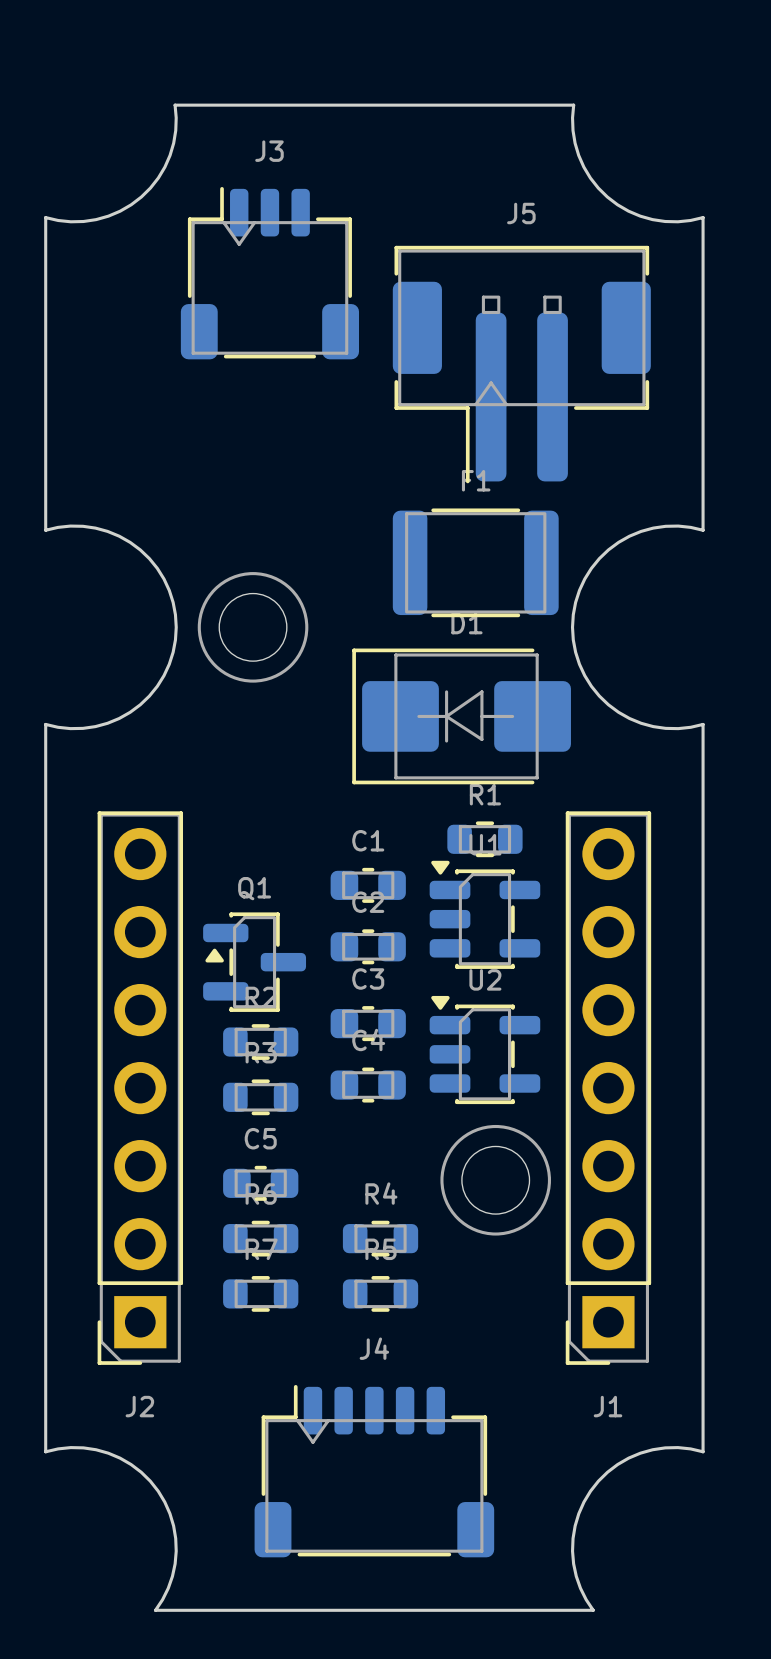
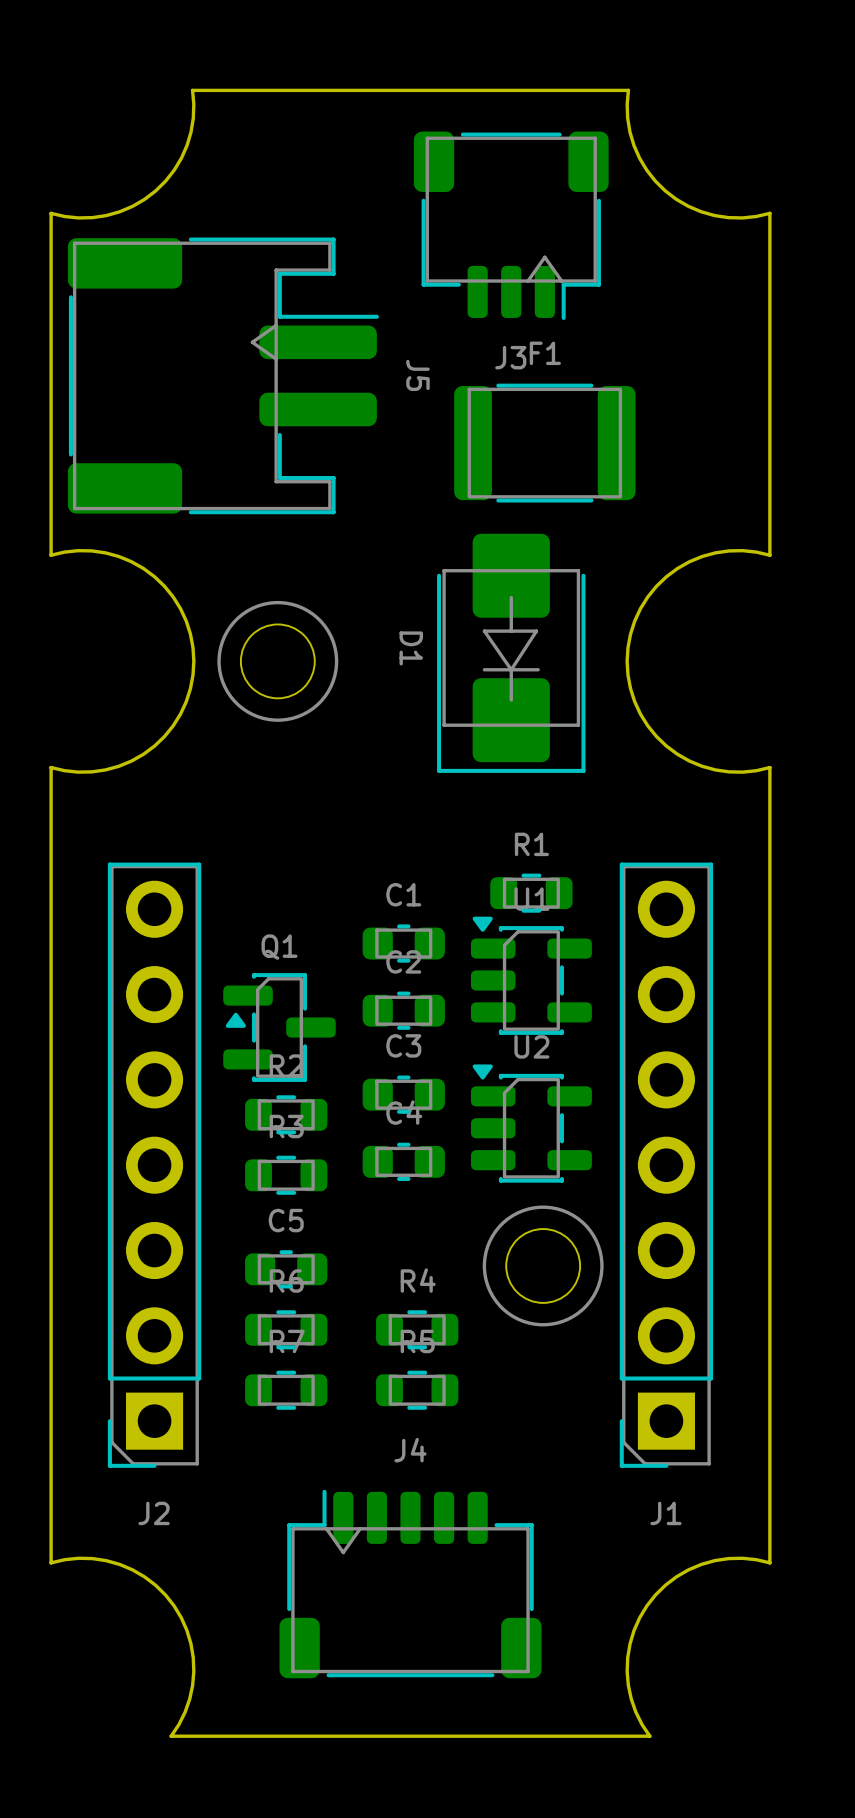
J5 name position: J5 (521, 213) -> J5 (417, 375)
J5 footprint: [392, 245, 651, 484] -> [67, 237, 379, 515]
J3 rotation: 0° (269, 273) -> 180° (511, 225)
J3 position: (269, 273) -> (511, 225)
F1 position: (475, 562) -> (544, 443)
D1 rotation: 0° (461, 716) -> 90° counterclockwise (511, 653)

